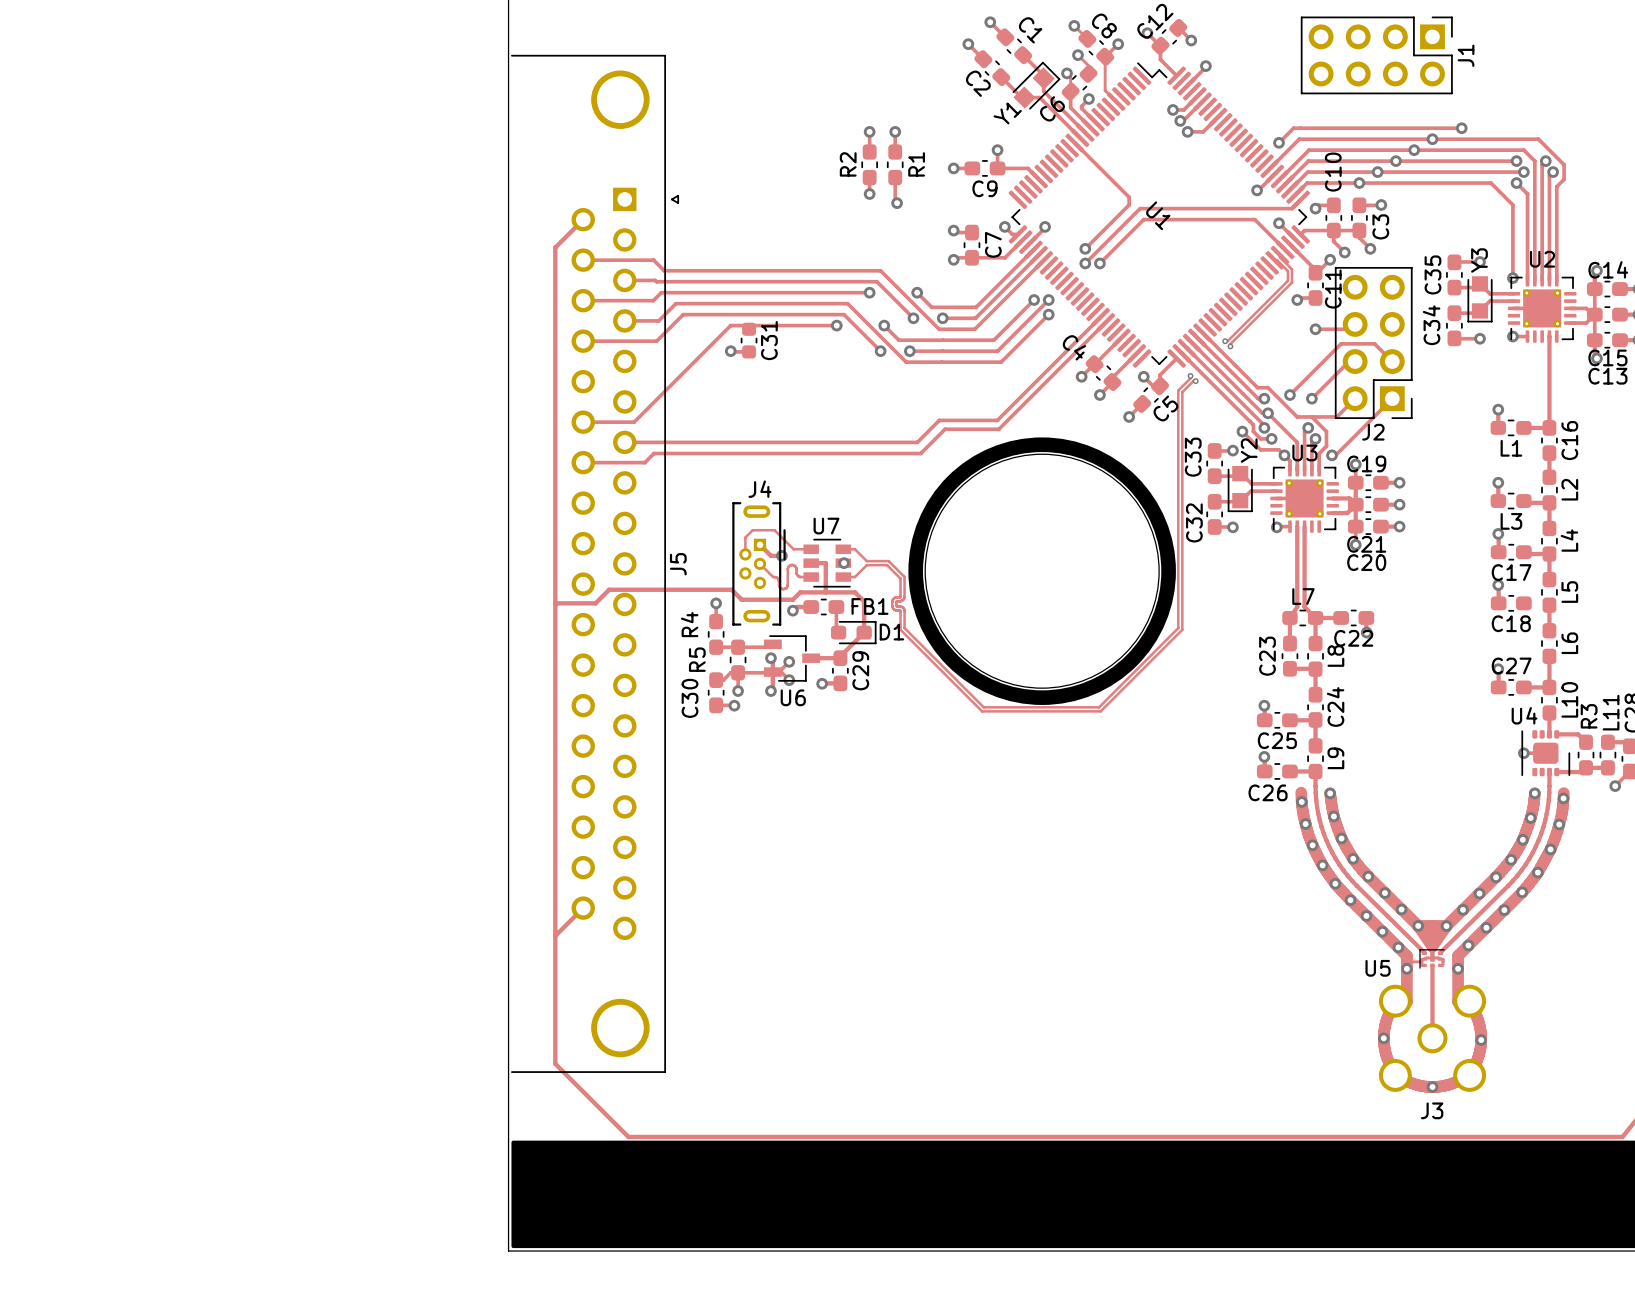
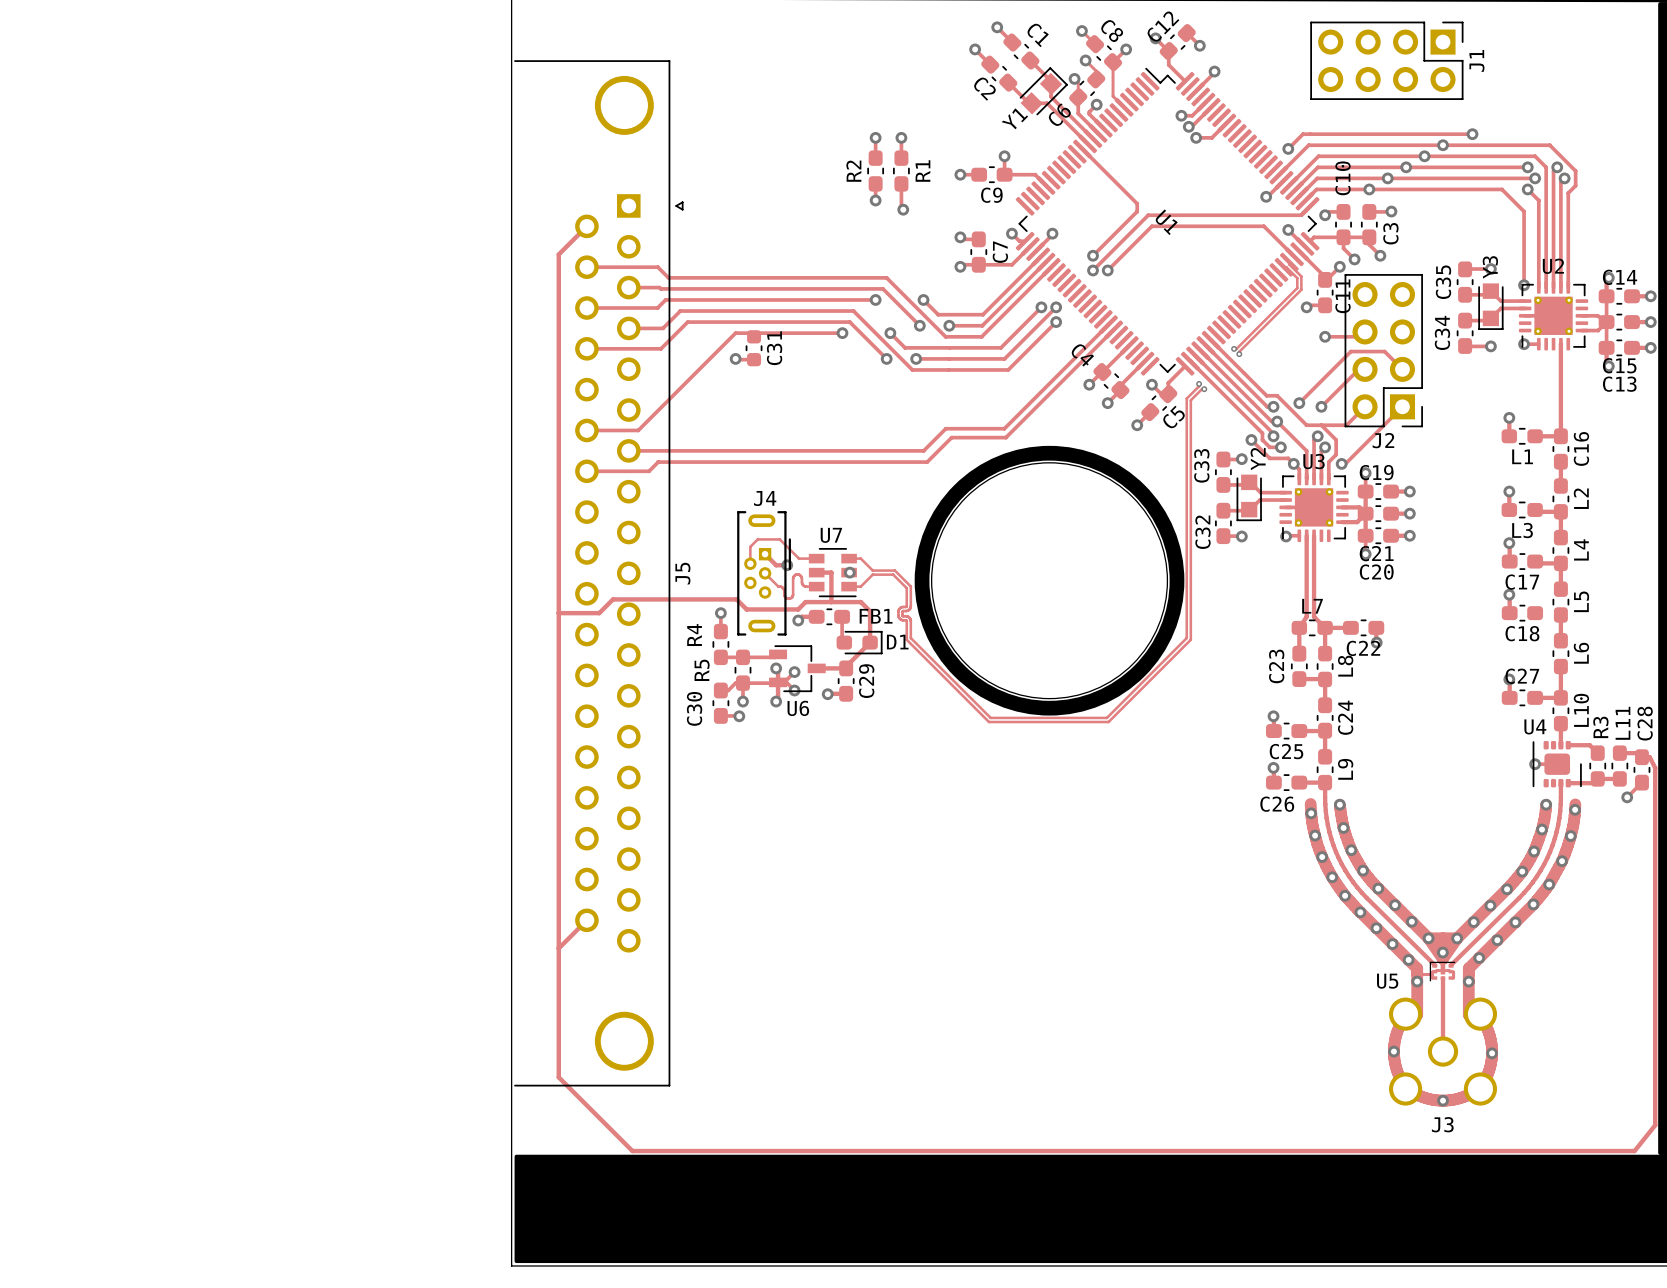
via: none -> (1442, 952)

